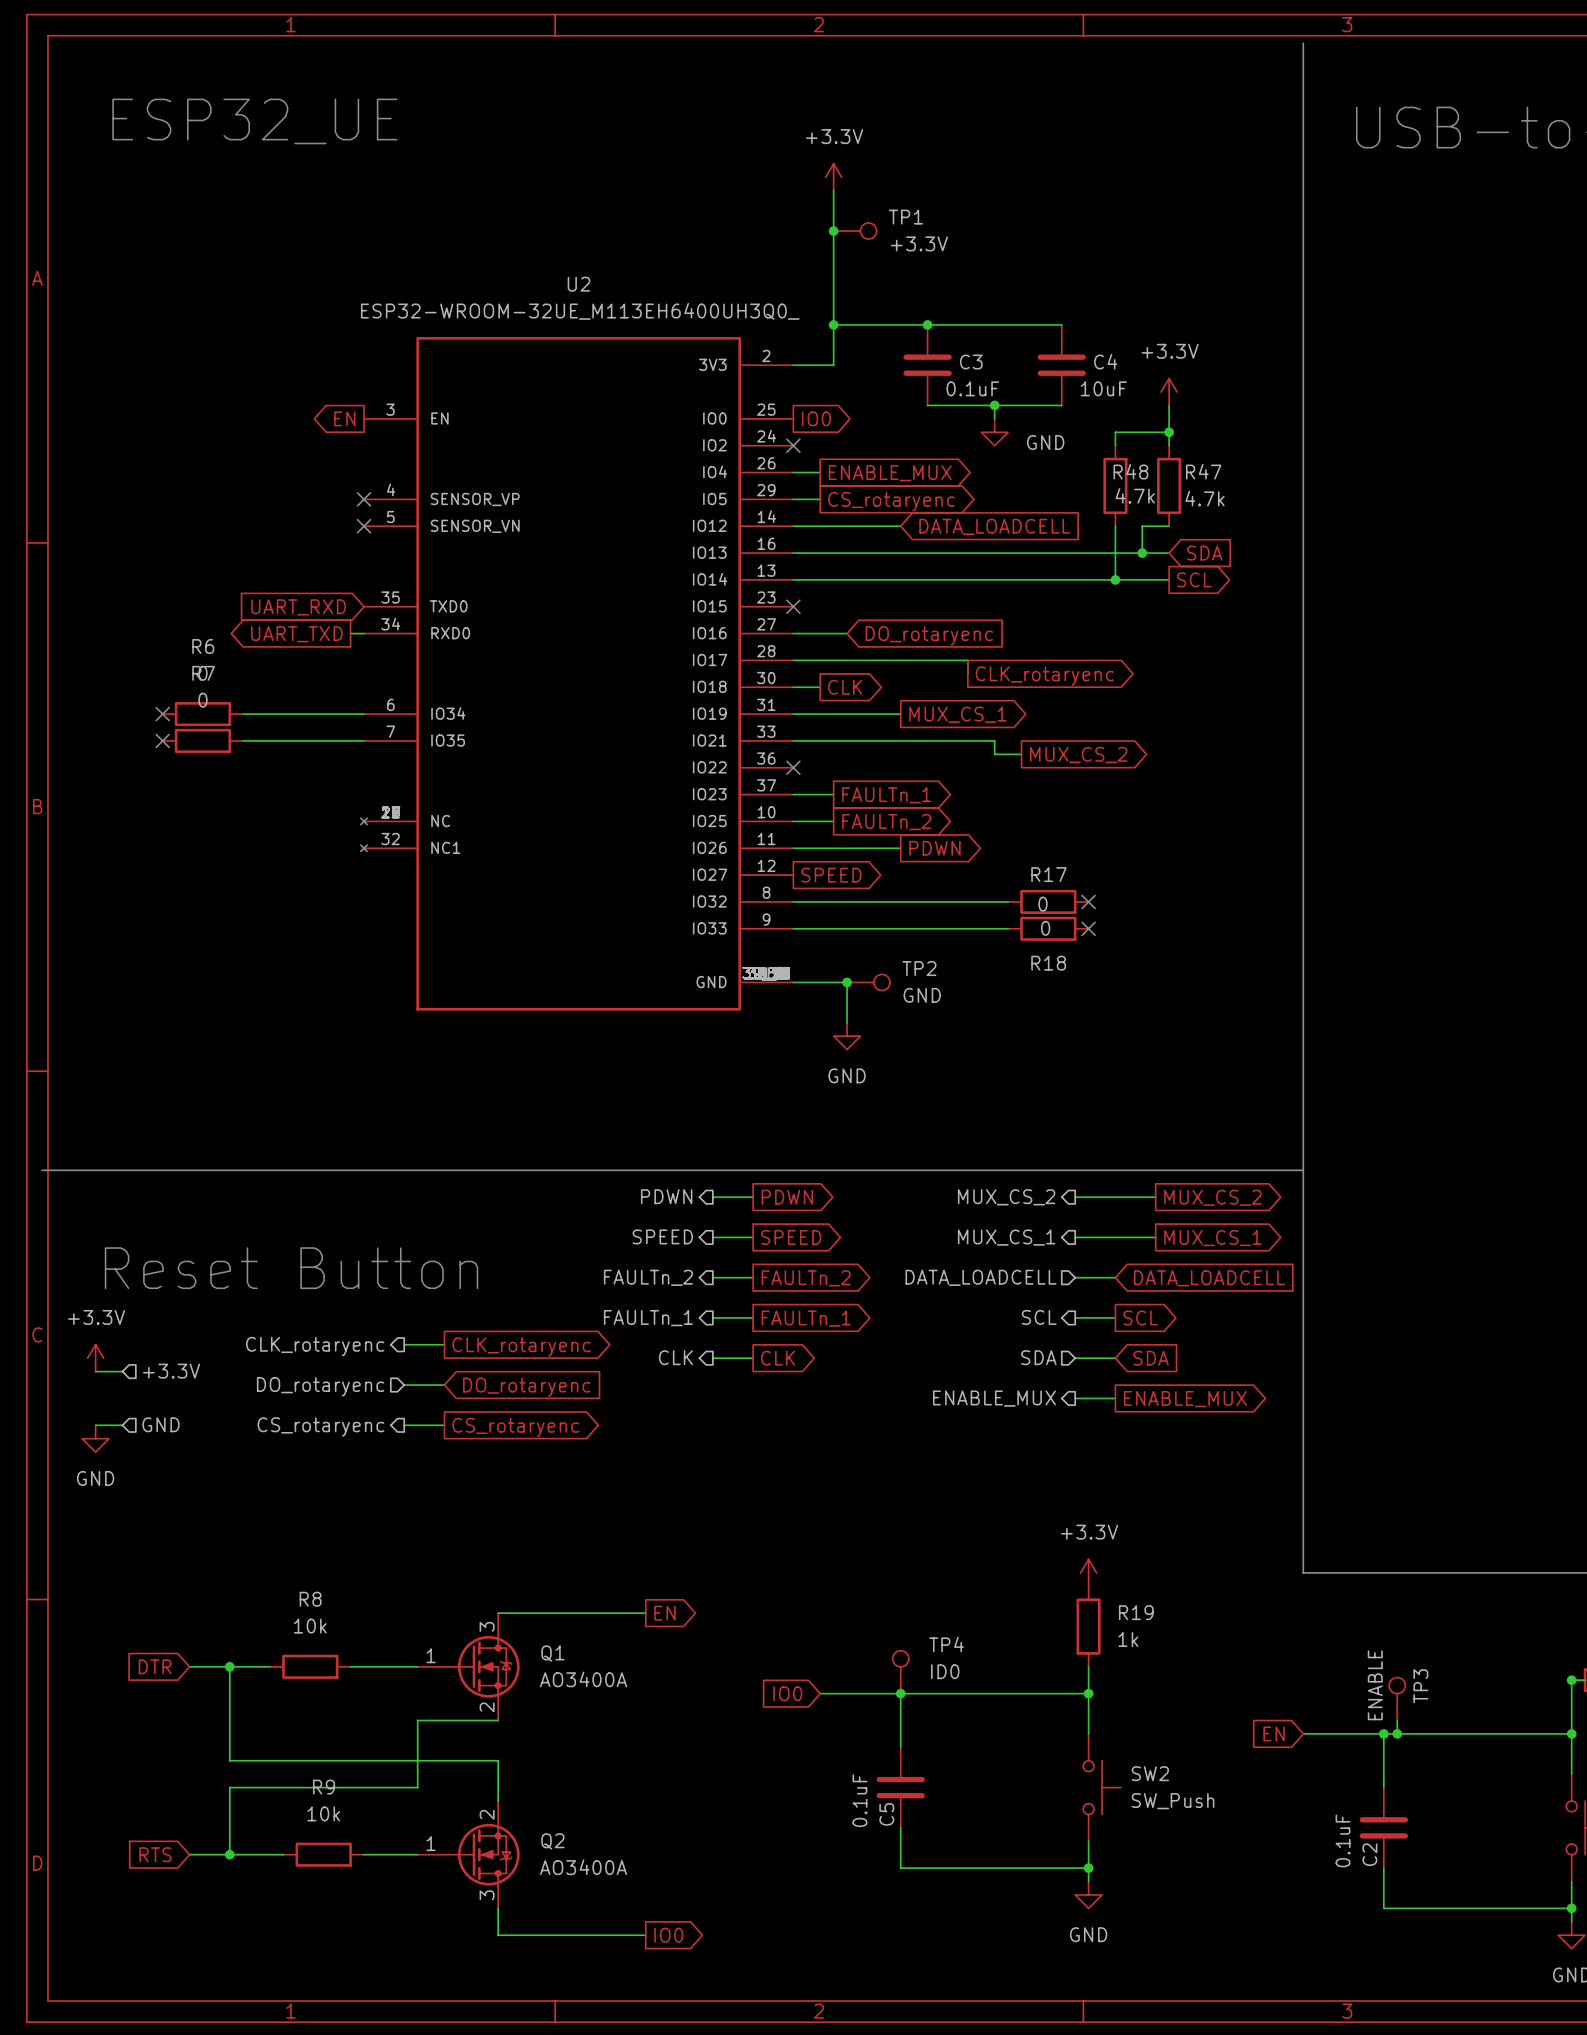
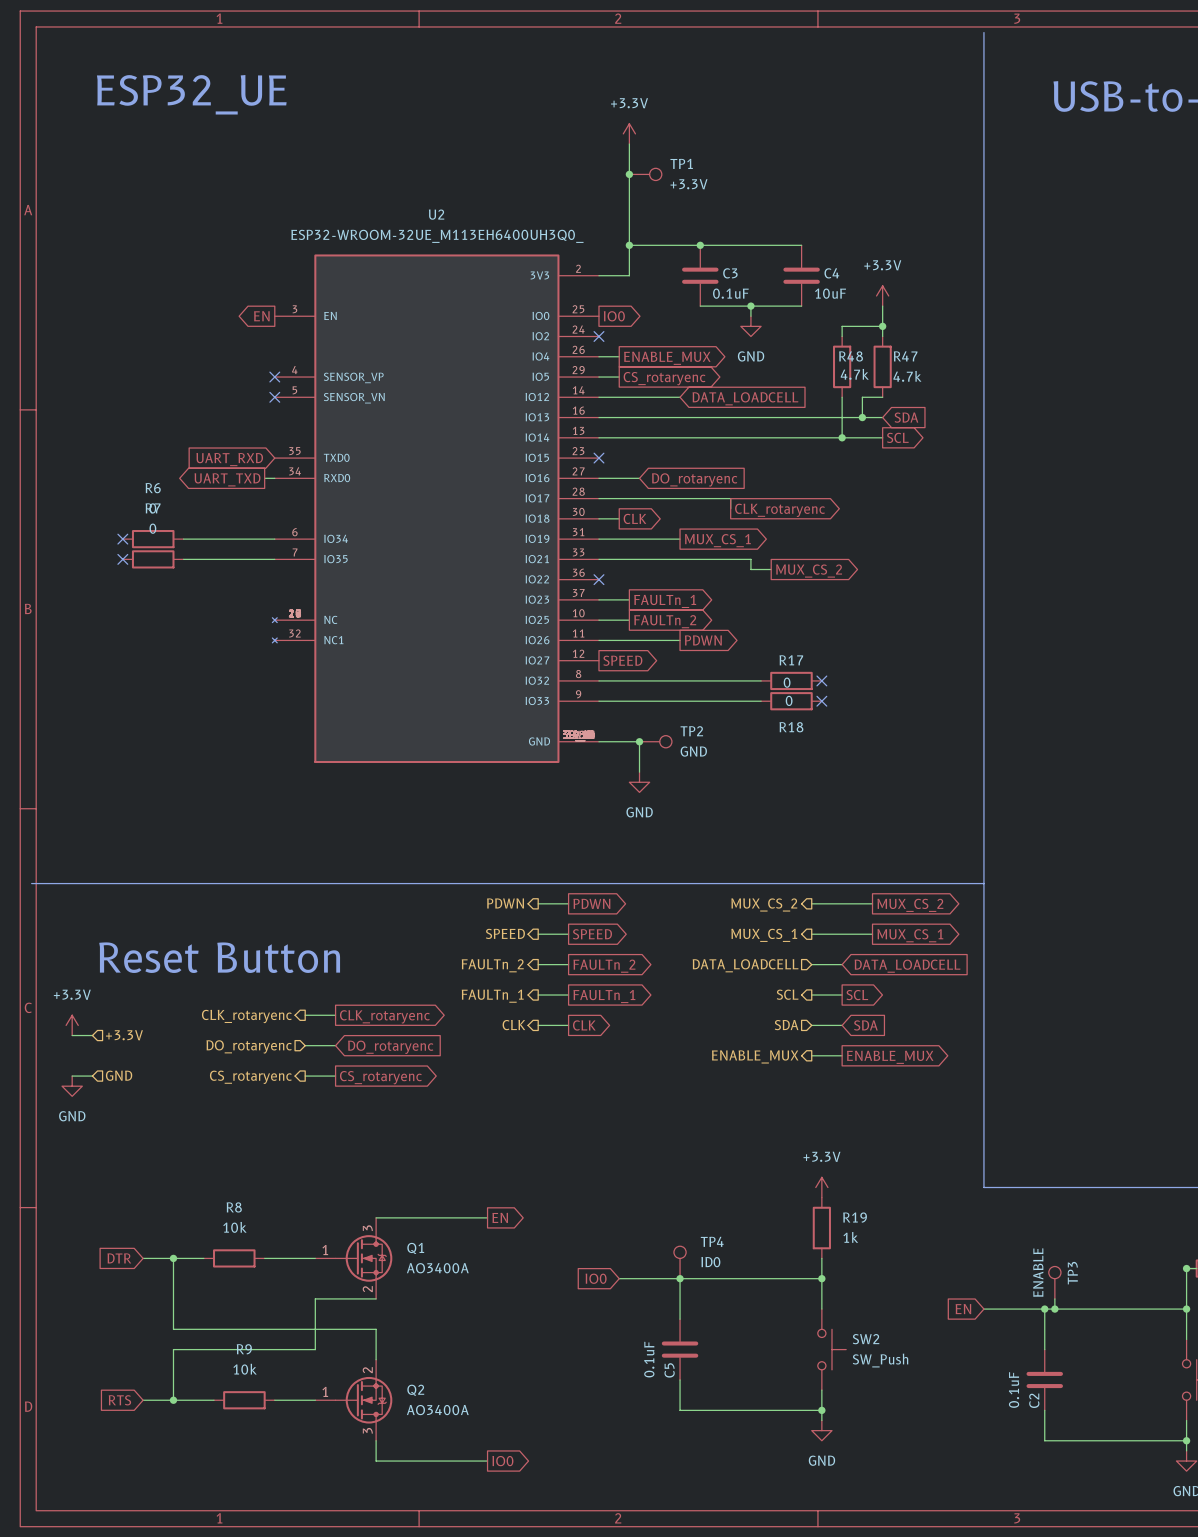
power symbol text position: GND (1045, 442) -> GND (751, 356)

